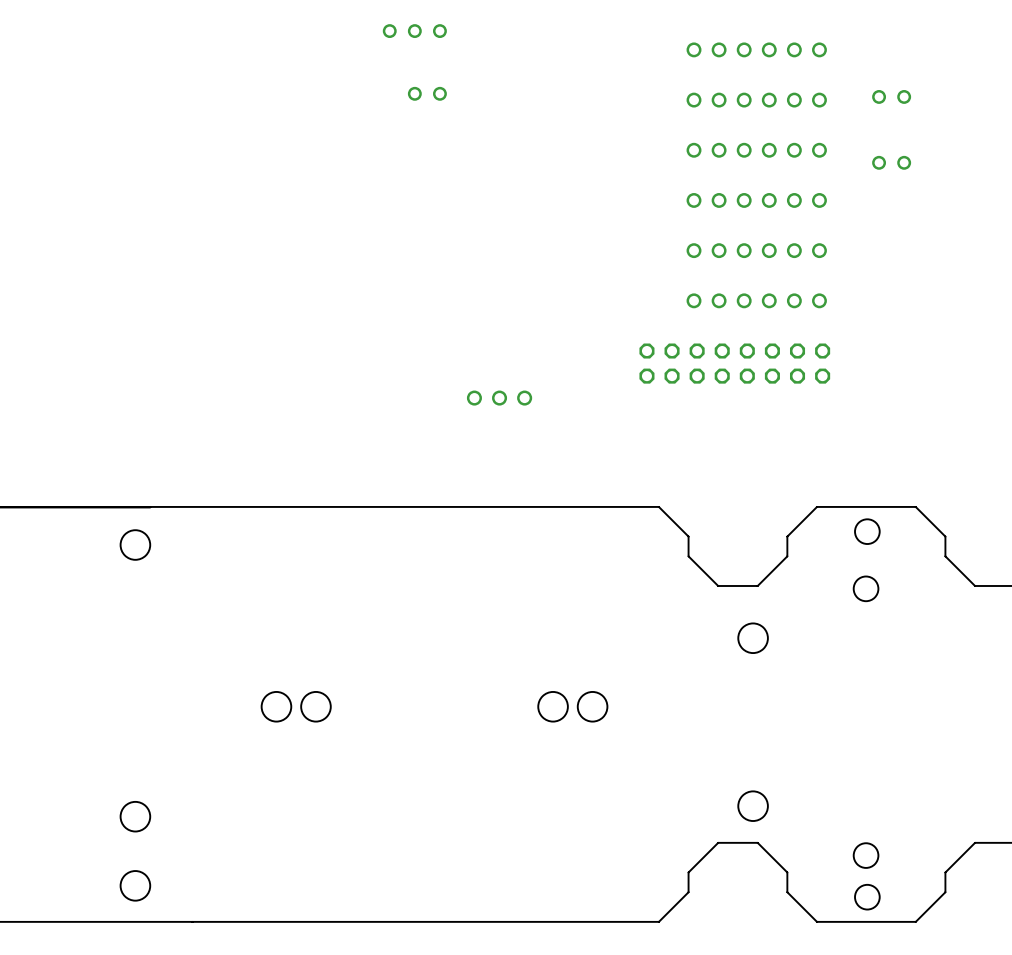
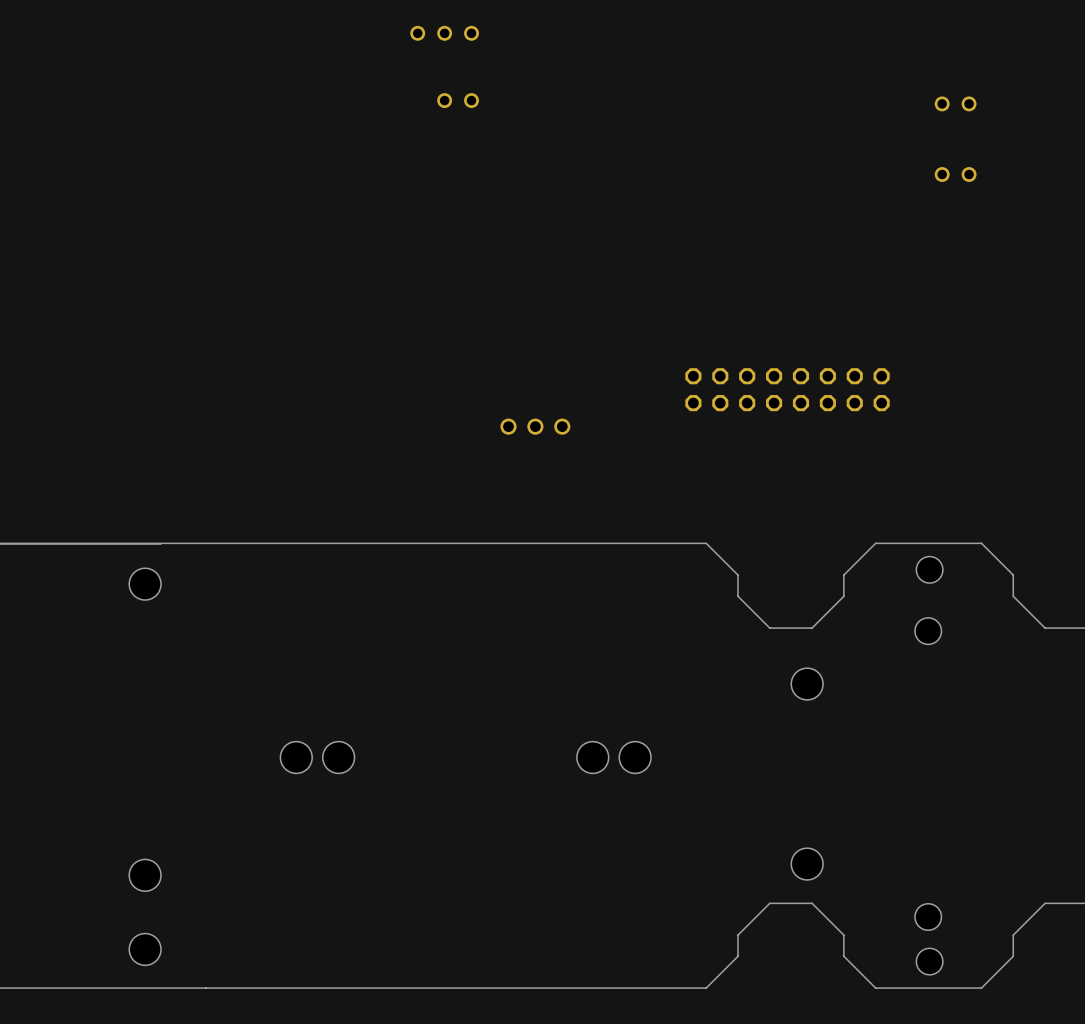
part: (756, 49) -> none
part: (756, 100) -> none
part: (756, 150) -> none
part: (756, 200) -> none
part: (756, 250) -> none
part: (756, 300) -> none

